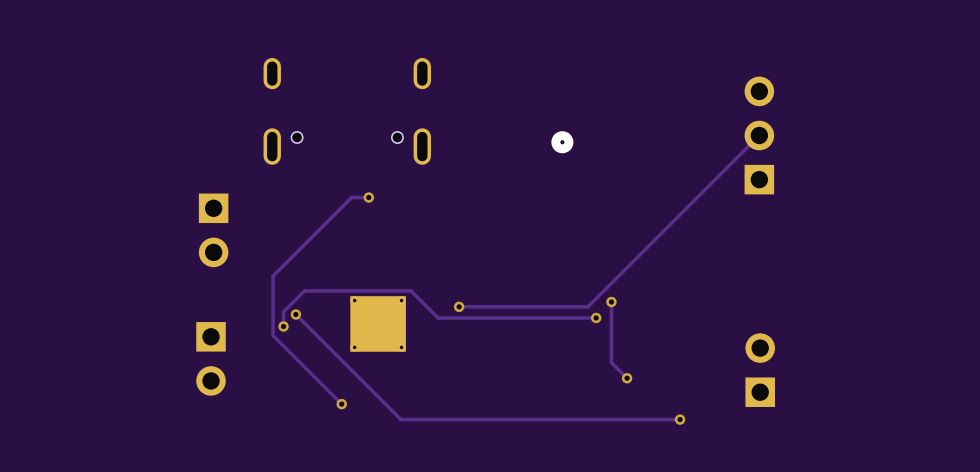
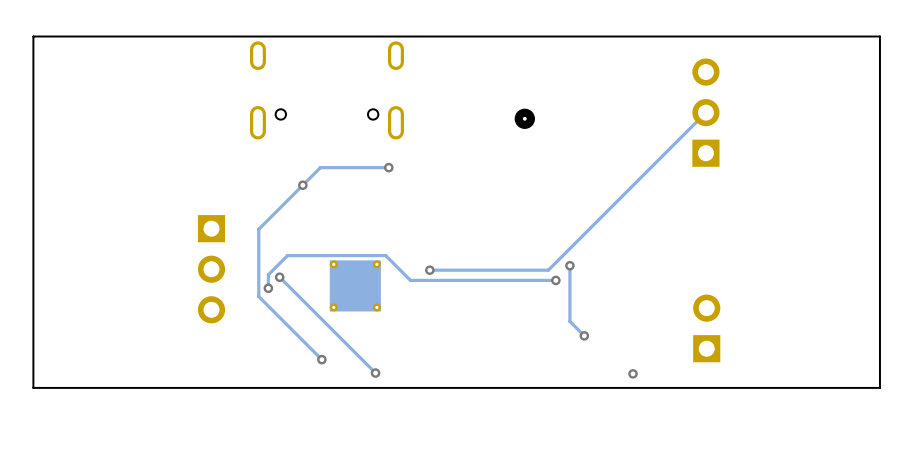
board edge: none -> (879, 36) (33, 36) (33, 387) (879, 387) (879, 36)
via: none -> (388, 167)
track: (368, 197) (351, 197) (273, 276) -> (388, 167) (320, 167) (258, 229) (258, 241)
via: (368, 197) -> none
via: none -> (302, 185)
part: (213, 230) -> none
part: none -> (211, 269)
part: (211, 358) -> none
via: none -> (375, 373)
track: (680, 419) (400, 419) -> none

